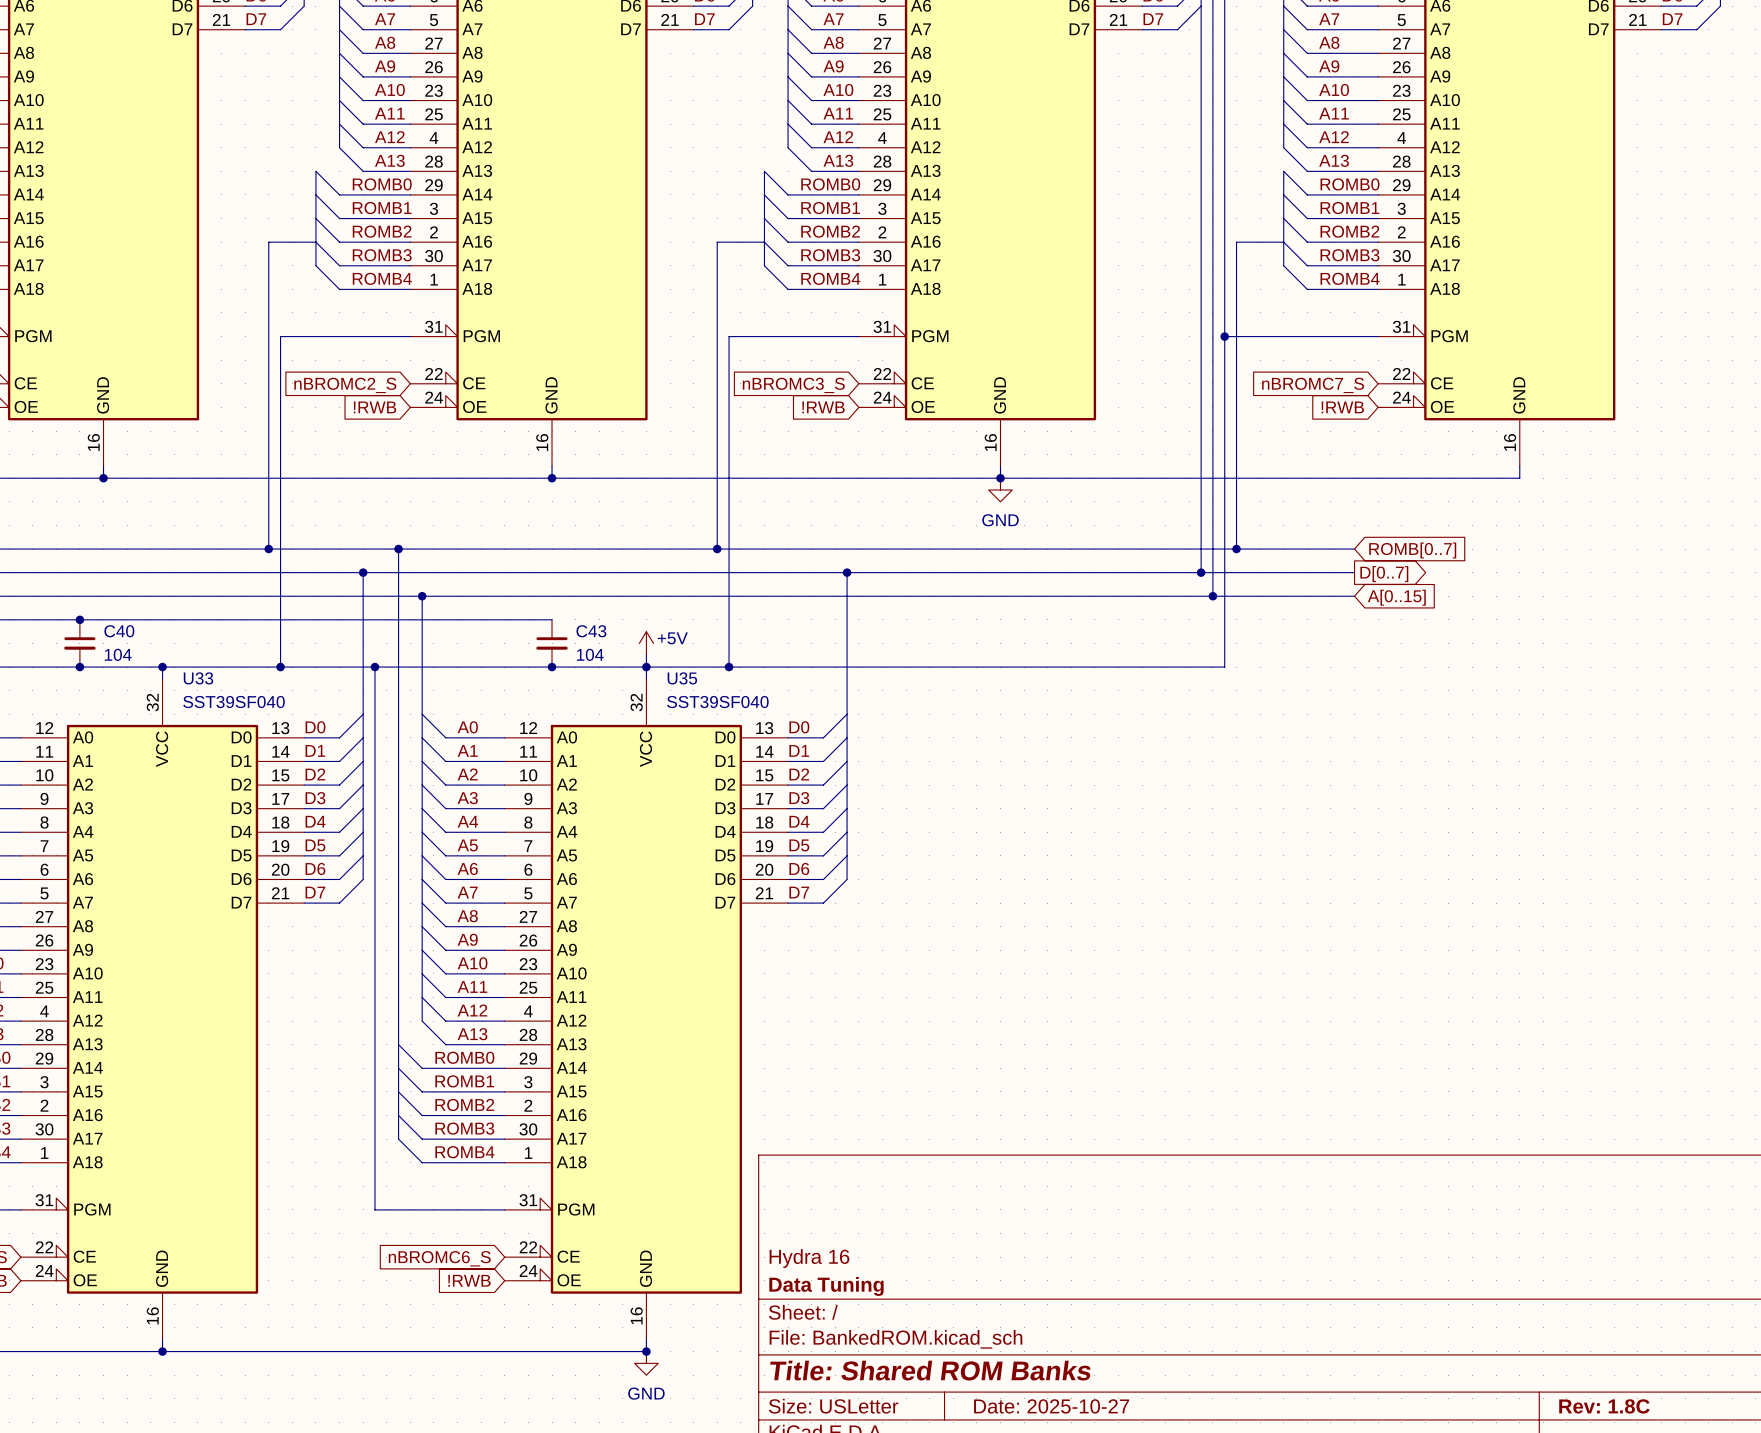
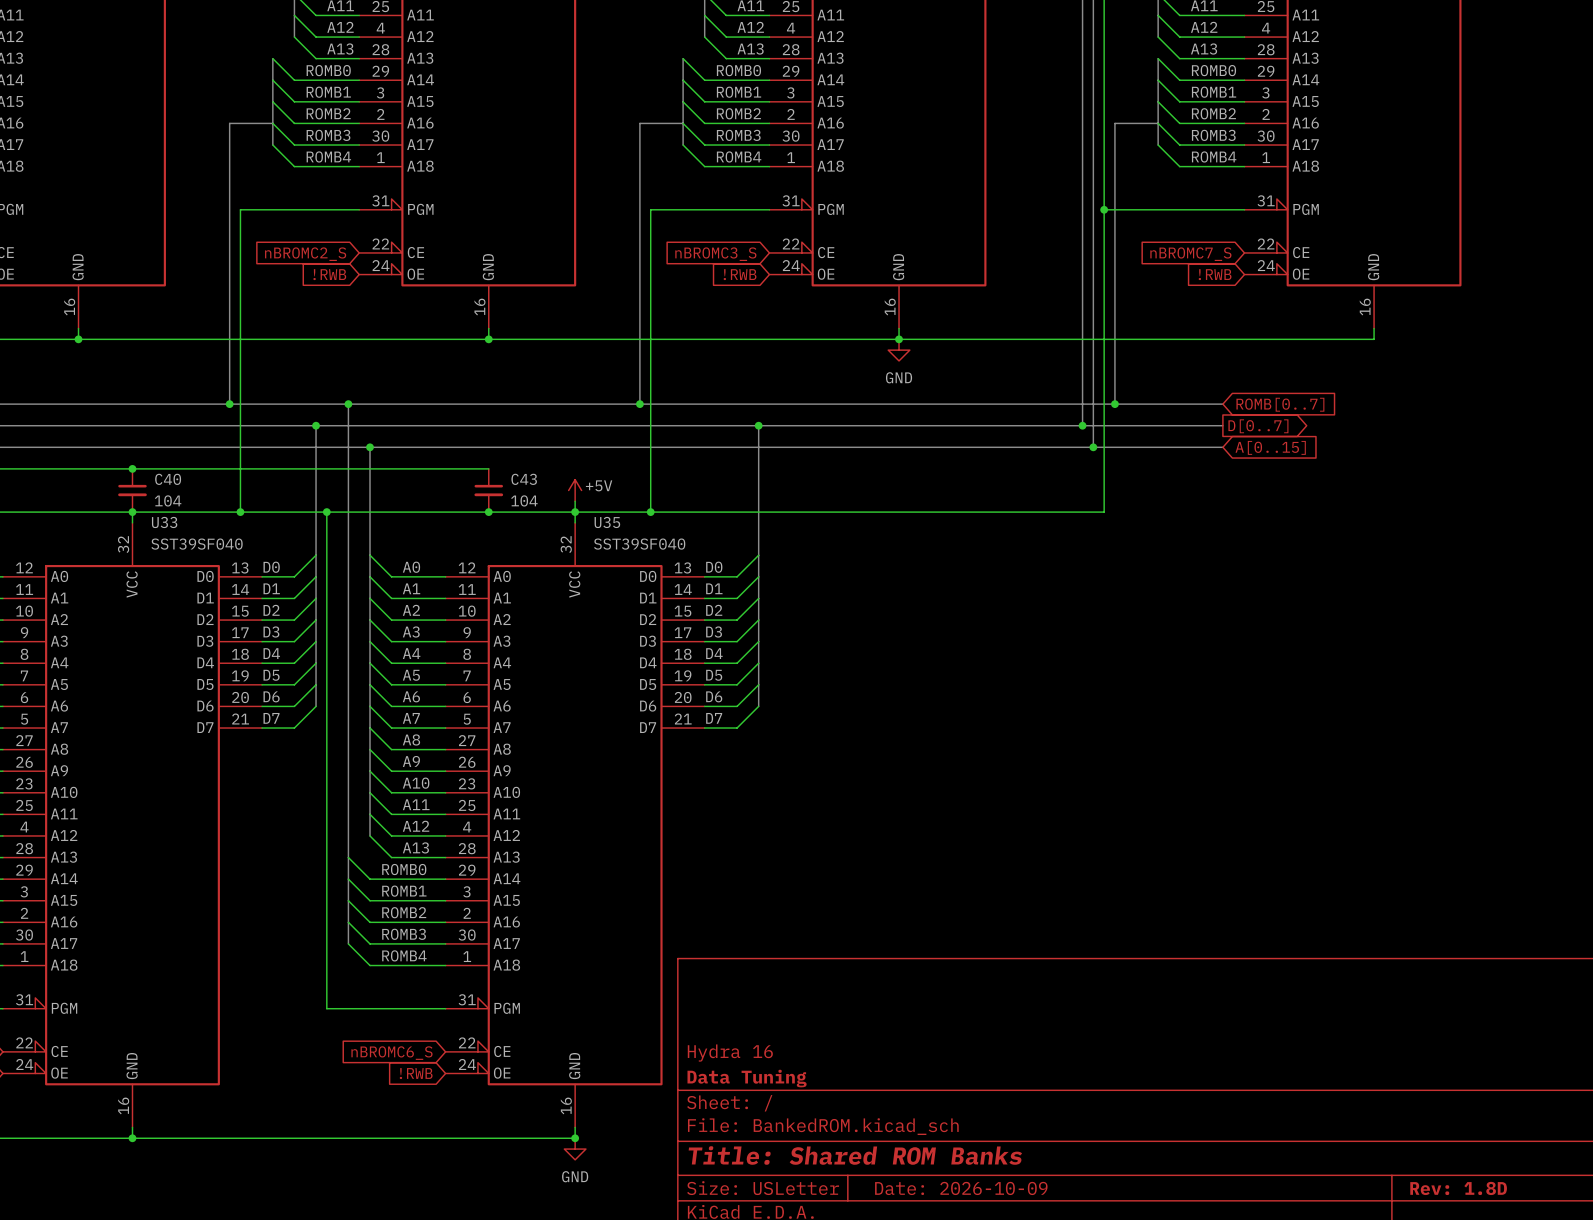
junction: (79, 619) -> none
junction: none -> (132, 468)
C40 position: (79, 643) -> (132, 490)
junction: (79, 667) -> none
title block: Date: 2025-10-27 (1051, 1406) -> Date: 2026-10-09 (961, 1188)
title block: Rev: 1.8C (1604, 1406) -> Rev: 1.8D (1458, 1188)

